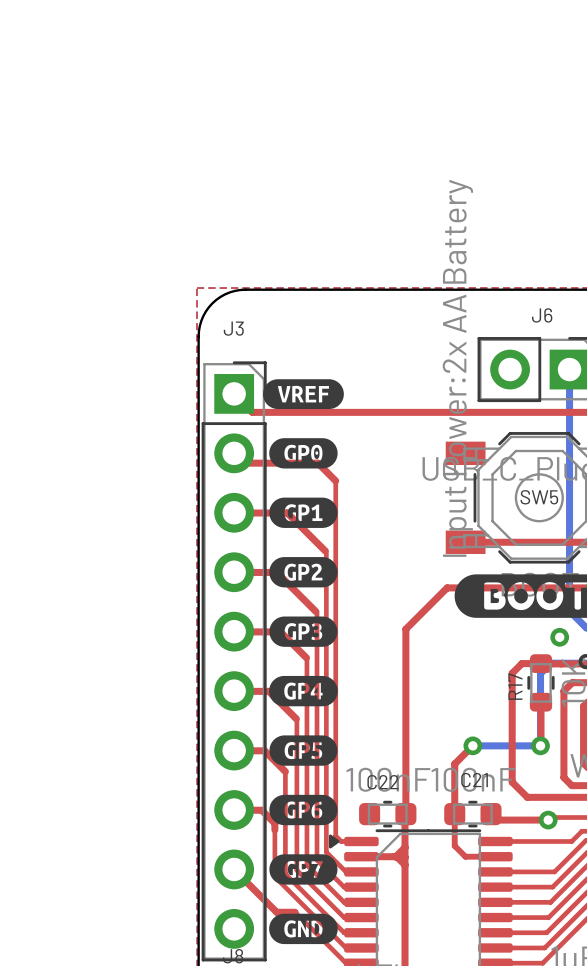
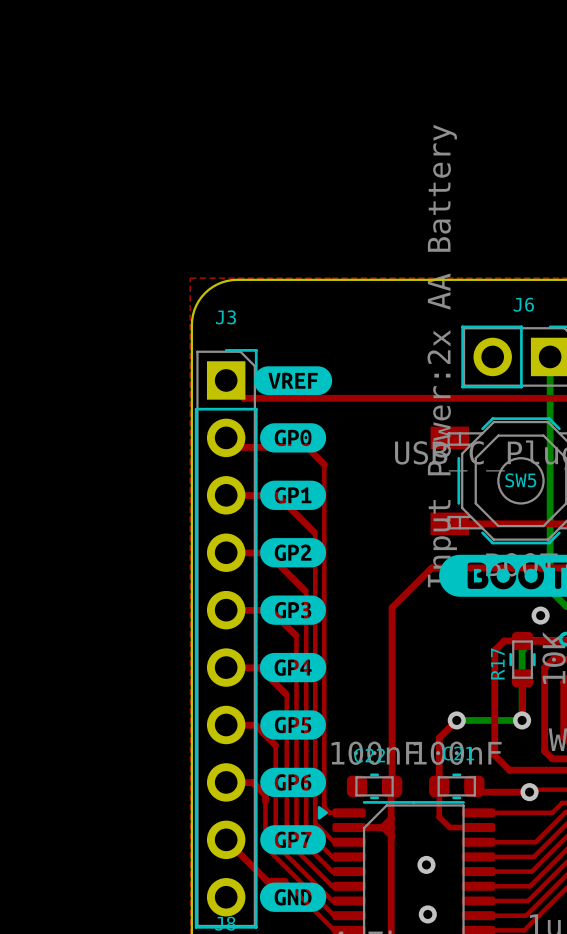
via: none -> (426, 864)
via: none -> (427, 914)

